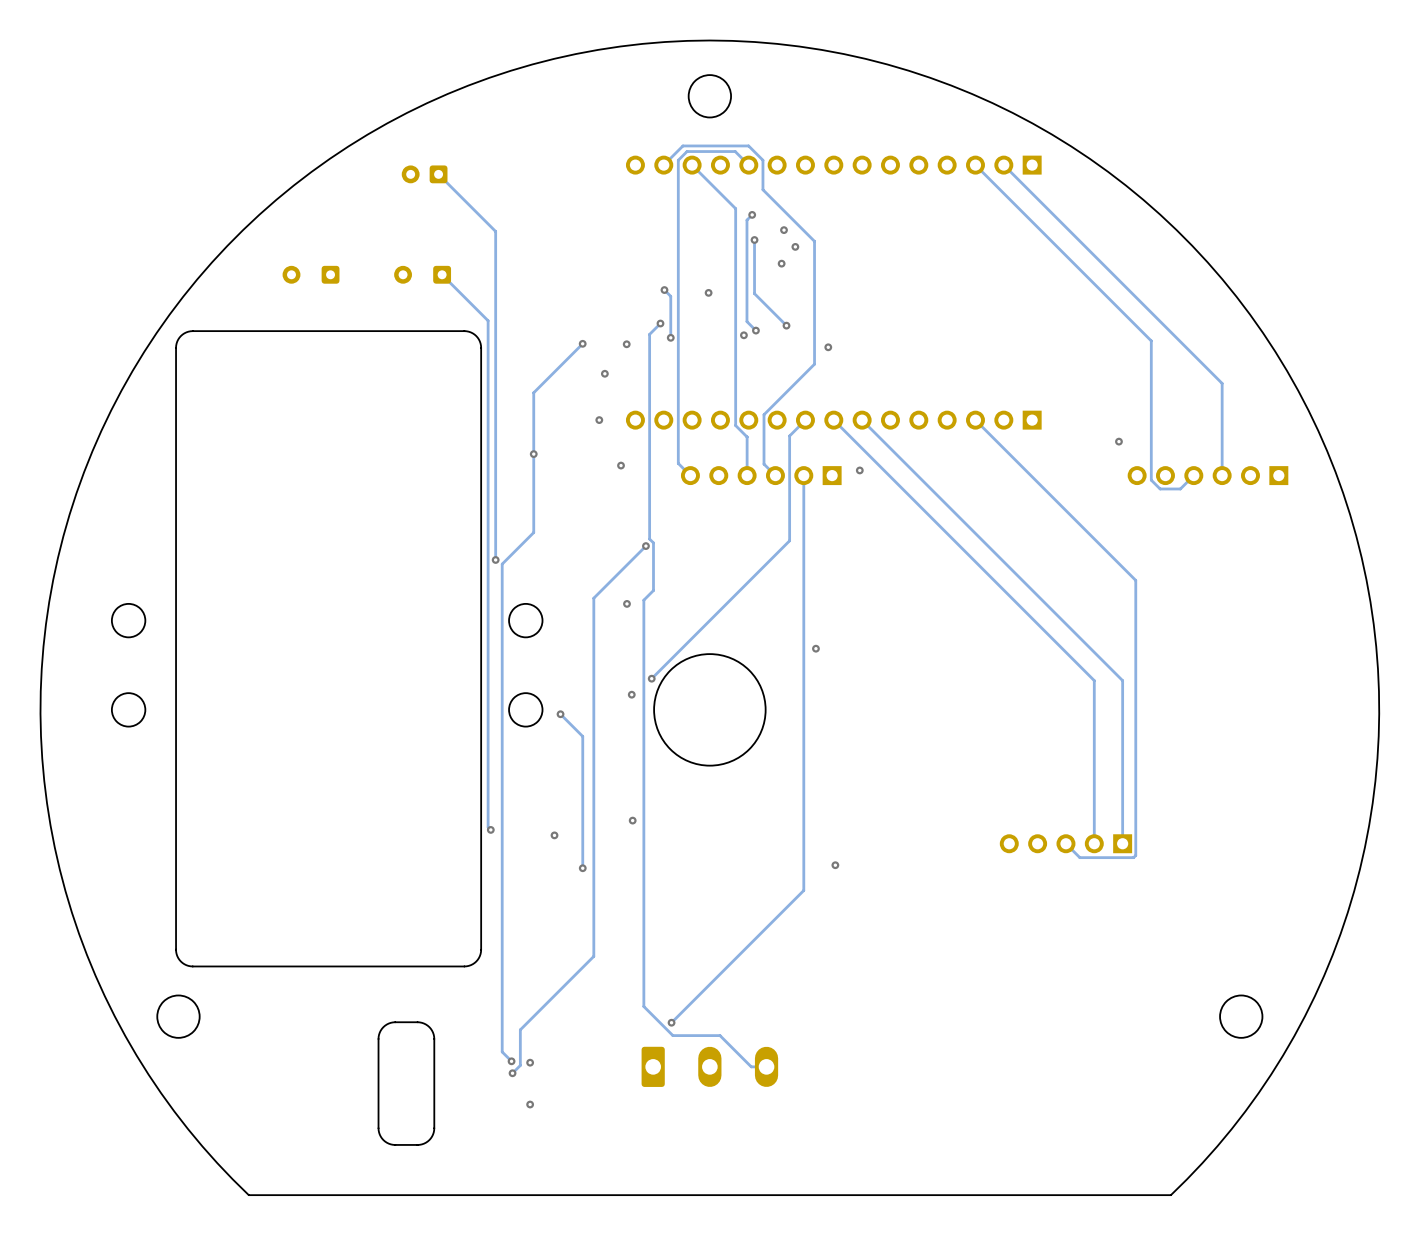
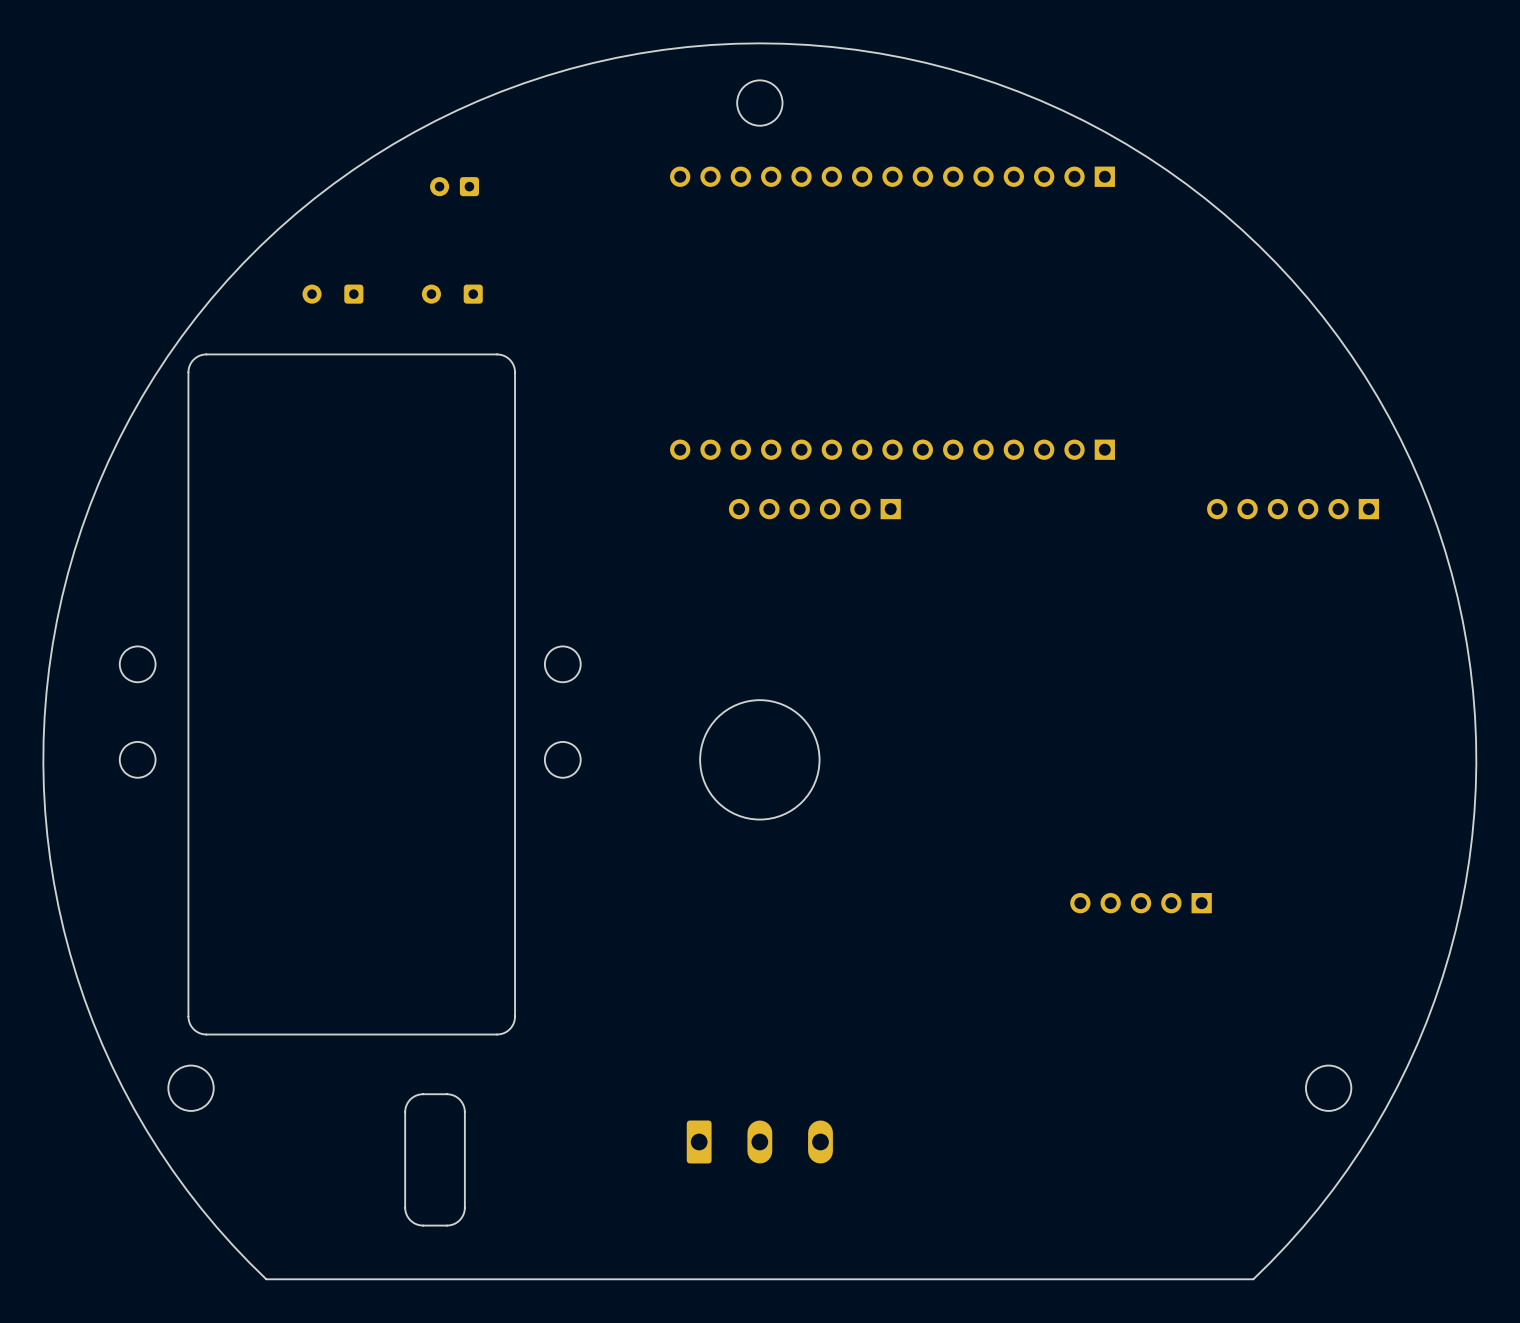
track: (663, 165) (682, 145) (748, 145) (762, 160) (762, 189) (814, 241) (814, 364) (764, 414) (764, 464) (775, 475) -> none
track: (692, 165) (735, 208) (735, 425) (747, 437) (747, 475) -> none
track: (748, 165) (735, 151) (687, 151) (678, 160) (678, 463) (690, 475) -> none
track: (975, 165) (1151, 340) (1151, 480) (1160, 488) (1180, 488) (1193, 475) -> none
track: (1003, 165) (1222, 383) (1222, 475) -> none
track: (438, 174) (495, 231) (495, 559) -> none
track: (752, 214) (746, 220) (746, 321) (755, 330) -> none
via: (752, 214) -> none
via: (784, 230) -> none
track: (754, 239) (754, 293) (786, 325) -> none
via: (754, 239) -> none
via: (795, 246) -> none
via: (781, 263) -> none
track: (442, 274) (488, 320) (488, 827) (490, 829) -> none
track: (664, 290) (670, 296) (670, 337) -> none
via: (664, 290) -> none
via: (708, 292) -> none
track: (660, 323) (649, 334) (649, 539) (653, 542) (653, 590) (643, 600) (643, 1006) (672, 1035) (720, 1035) (751, 1066) (766, 1066) -> none
via: (660, 323) -> none
via: (786, 325) -> none
via: (755, 330) -> none
via: (743, 335) -> none
via: (670, 337) -> none
track: (582, 343) (533, 392) (533, 532) (502, 564) (502, 1051) (511, 1061) -> none
via: (582, 343) -> none
via: (626, 344) -> none
via: (828, 347) -> none
via: (604, 373) -> none
via: (599, 420) -> none
track: (805, 420) (789, 435) (789, 540) (651, 678) -> none
track: (833, 420) (1094, 680) (1094, 843) -> none
track: (862, 420) (1122, 680) (1122, 843) -> none
track: (975, 420) (1135, 580) (1135, 855) (1133, 857) (1079, 857) (1065, 843) -> none
via: (1118, 441) -> none
via: (533, 454) -> none
via: (621, 465) -> none
via: (859, 470) -> none
track: (803, 475) (803, 890) (671, 1022) -> none
track: (645, 546) (593, 598) (593, 956) (520, 1029) (520, 1065) (512, 1073) -> none
via: (645, 546) -> none
via: (495, 559) -> none
via: (626, 603) -> none
via: (815, 648) -> none
via: (651, 678) -> none
via: (631, 694) -> none
track: (560, 714) (582, 736) (582, 868) -> none
via: (560, 714) -> none
via: (632, 820) -> none
via: (490, 829) -> none
via: (554, 835) -> none
via: (835, 865) -> none
via: (582, 868) -> none
via: (671, 1022) -> none
via: (511, 1061) -> none
via: (530, 1062) -> none
via: (512, 1073) -> none
via: (530, 1104) -> none

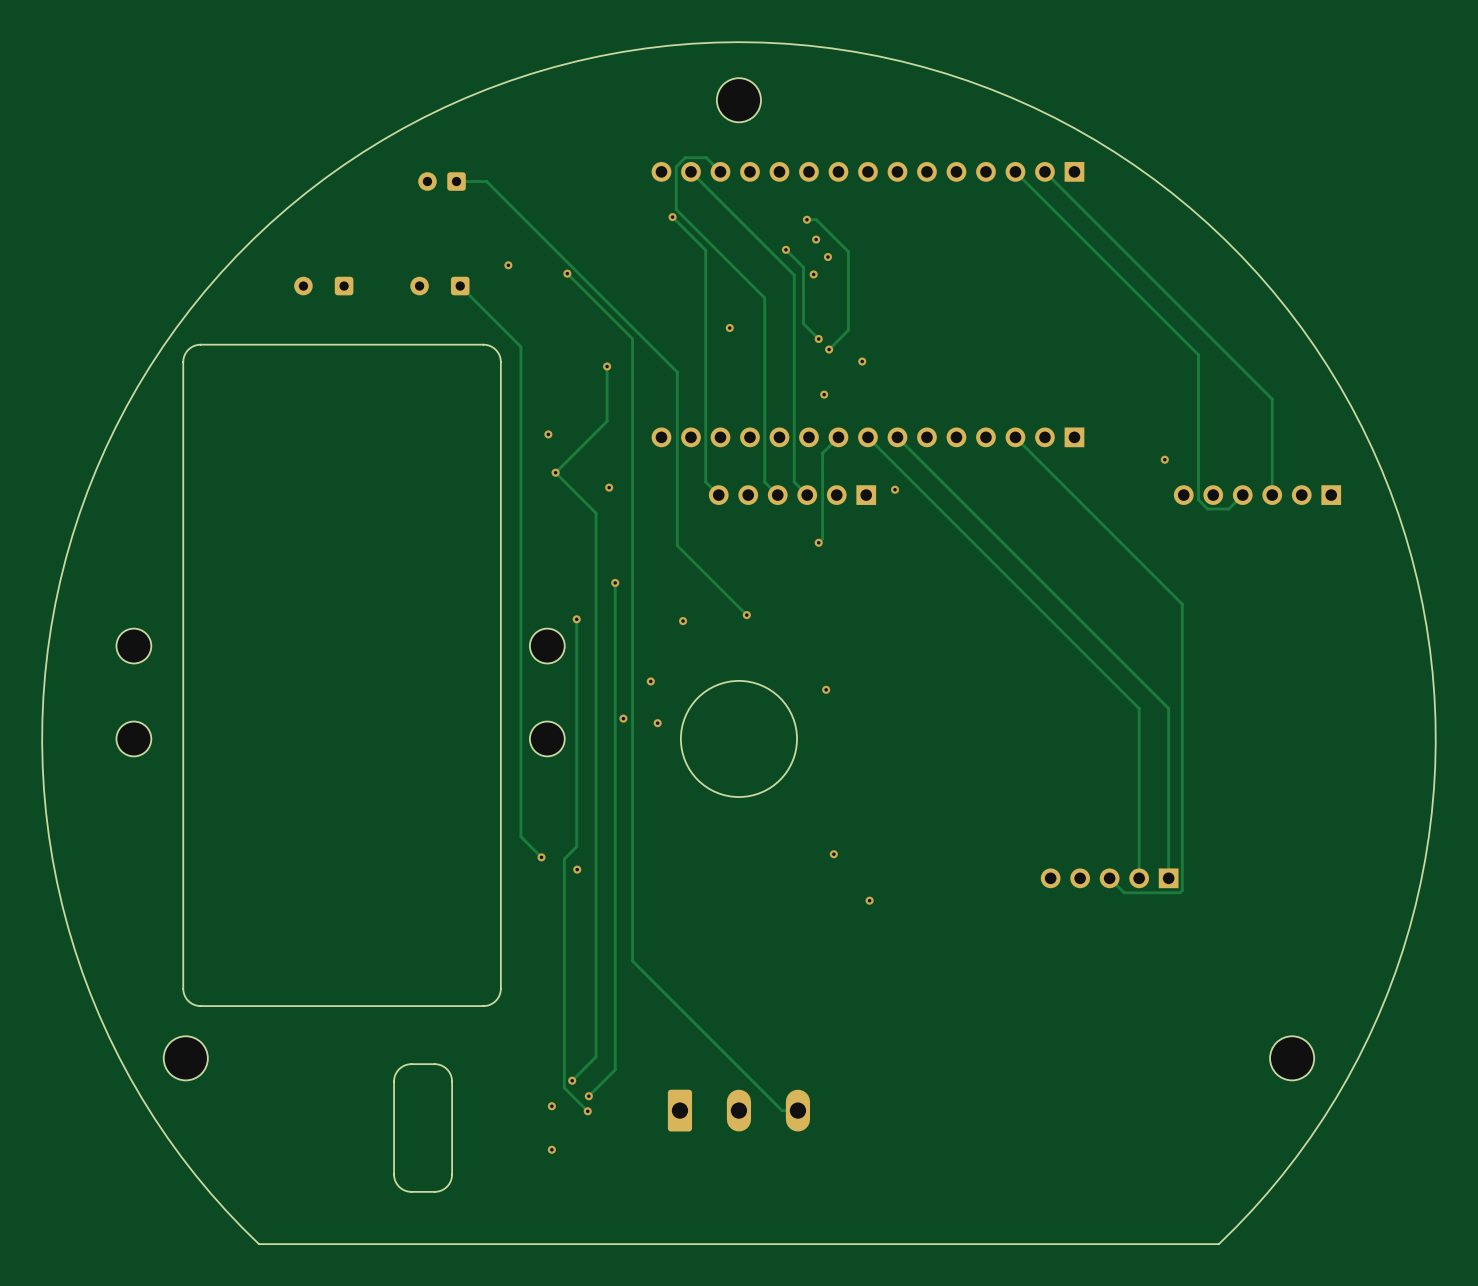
track: none -> (690, 171) (794, 275) (794, 482) (807, 495)
track: none -> (720, 171) (706, 157) (685, 157) (676, 166) (676, 209) (764, 298) (764, 482) (777, 495)
track: none -> (1015, 171) (1198, 354) (1198, 499) (1207, 509) (1228, 509) (1242, 495)
track: none -> (1044, 171) (1272, 399) (1272, 495)
track: none -> (456, 181) (486, 181) (677, 372) (677, 545) (746, 615)
track: none -> (672, 217) (705, 250) (705, 482) (718, 495)
via: none -> (672, 217)
track: none -> (806, 219) (816, 219) (848, 251) (848, 330) (829, 349)
via: none -> (806, 219)
via: none -> (816, 239)
track: none -> (785, 249) (803, 267) (803, 323) (818, 339)
via: none -> (785, 249)
via: none -> (827, 257)
via: none -> (508, 265)
track: none -> (567, 273) (632, 338) (632, 961) (782, 1110) (797, 1110)
via: none -> (567, 273)
via: none -> (813, 274)
track: none -> (460, 286) (520, 346) (520, 836) (541, 857)
via: none -> (729, 327)
via: none -> (818, 339)
via: none -> (829, 349)
via: none -> (862, 361)
track: none -> (607, 366) (607, 421) (555, 472) (596, 513) (596, 1056) (572, 1080)
via: none -> (607, 366)
via: none -> (824, 394)
via: none -> (548, 434)
track: none -> (838, 437) (822, 453) (822, 538) (818, 542)
track: none -> (867, 437) (1139, 708) (1139, 878)
track: none -> (897, 437) (1168, 708) (1168, 878)
track: none -> (1015, 437) (1182, 604) (1182, 890) (1180, 892) (1124, 892) (1109, 878)
via: none -> (1164, 459)
via: none -> (555, 472)
via: none -> (609, 487)
via: none -> (895, 489)
via: none -> (818, 542)
track: none -> (615, 582) (615, 1069) (588, 1096)
via: none -> (615, 582)
via: none -> (746, 615)
track: none -> (576, 619) (576, 846) (564, 859) (564, 1087) (587, 1111)
via: none -> (576, 619)
via: none -> (683, 621)
via: none -> (650, 681)
via: none -> (826, 689)
via: none -> (623, 718)
via: none -> (657, 723)
via: none -> (833, 854)
via: none -> (541, 857)
via: none -> (577, 869)
via: none -> (869, 900)
via: none -> (572, 1080)
via: none -> (588, 1096)
via: none -> (551, 1106)
via: none -> (587, 1111)
via: none -> (551, 1149)

